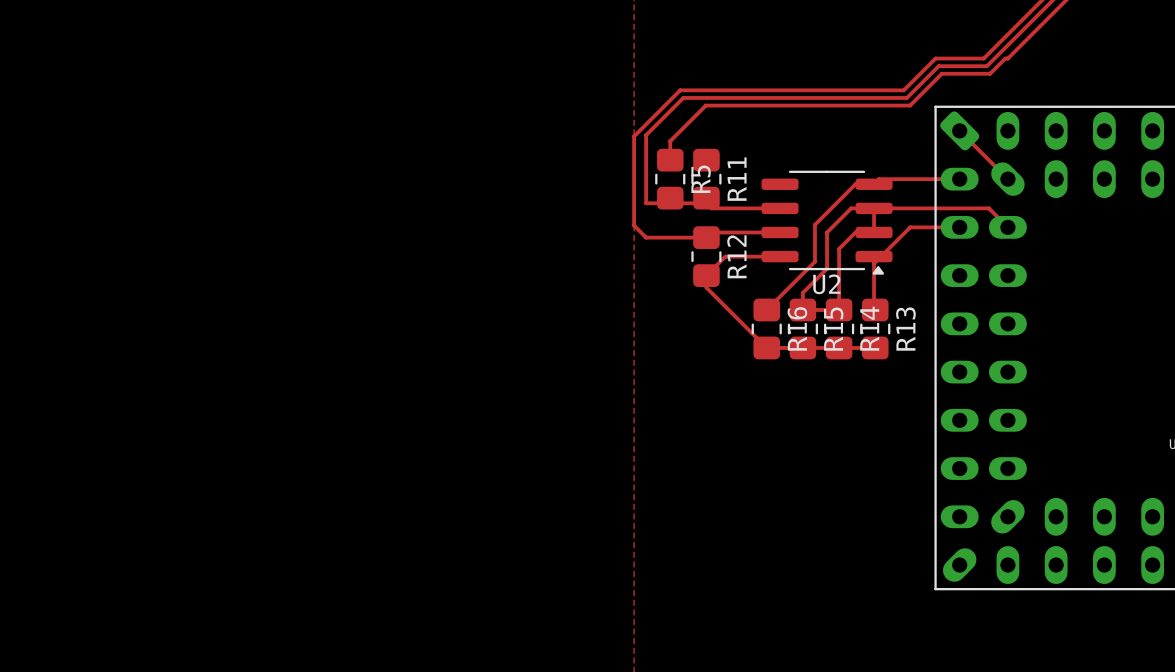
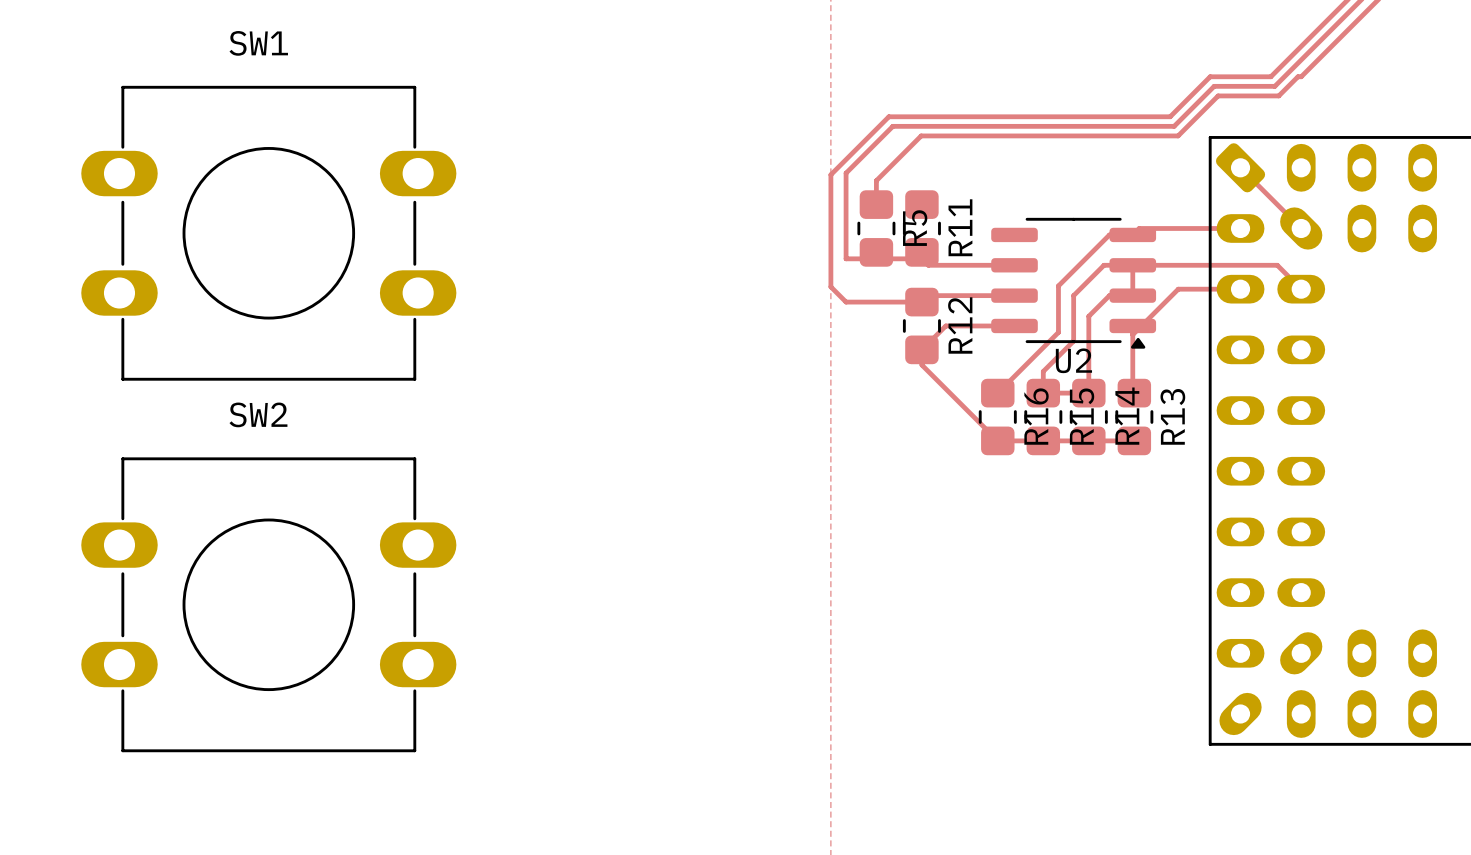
SW1: none -> (268, 233)
SW2: none -> (268, 604)

